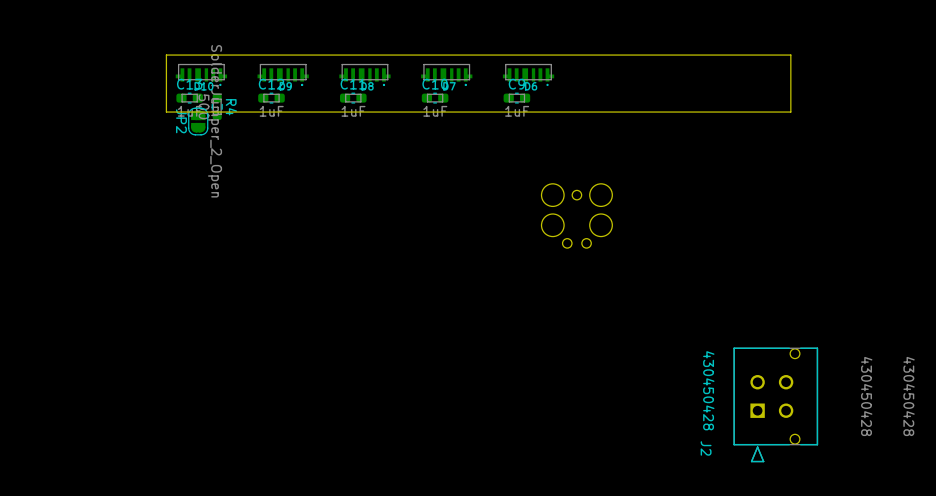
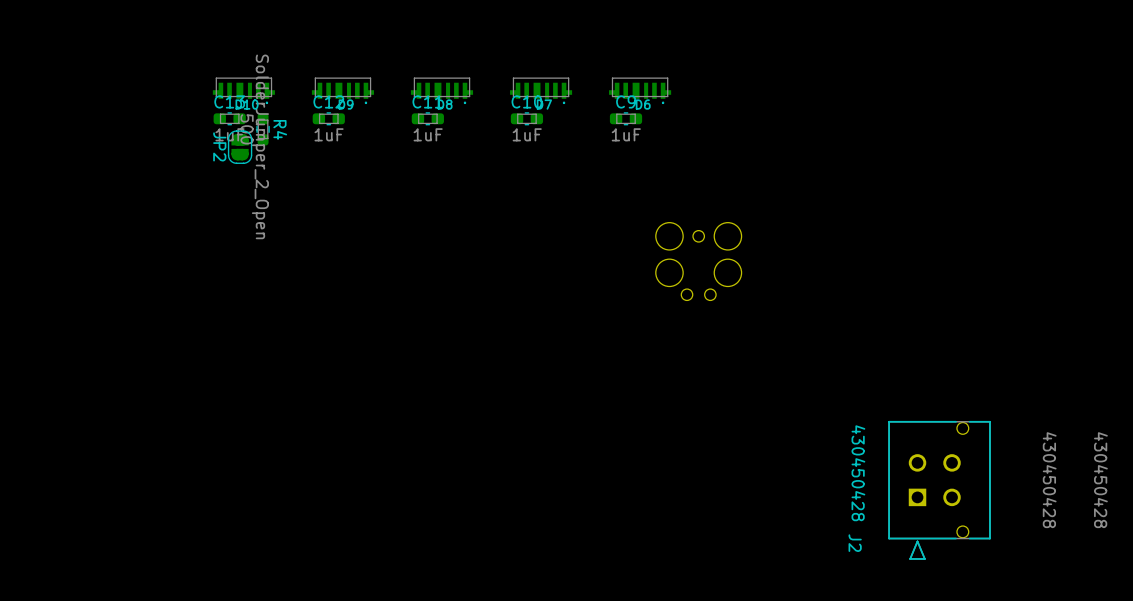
board edge: (790, 55) (790, 112) (166, 112) (166, 55) (790, 55) -> none

